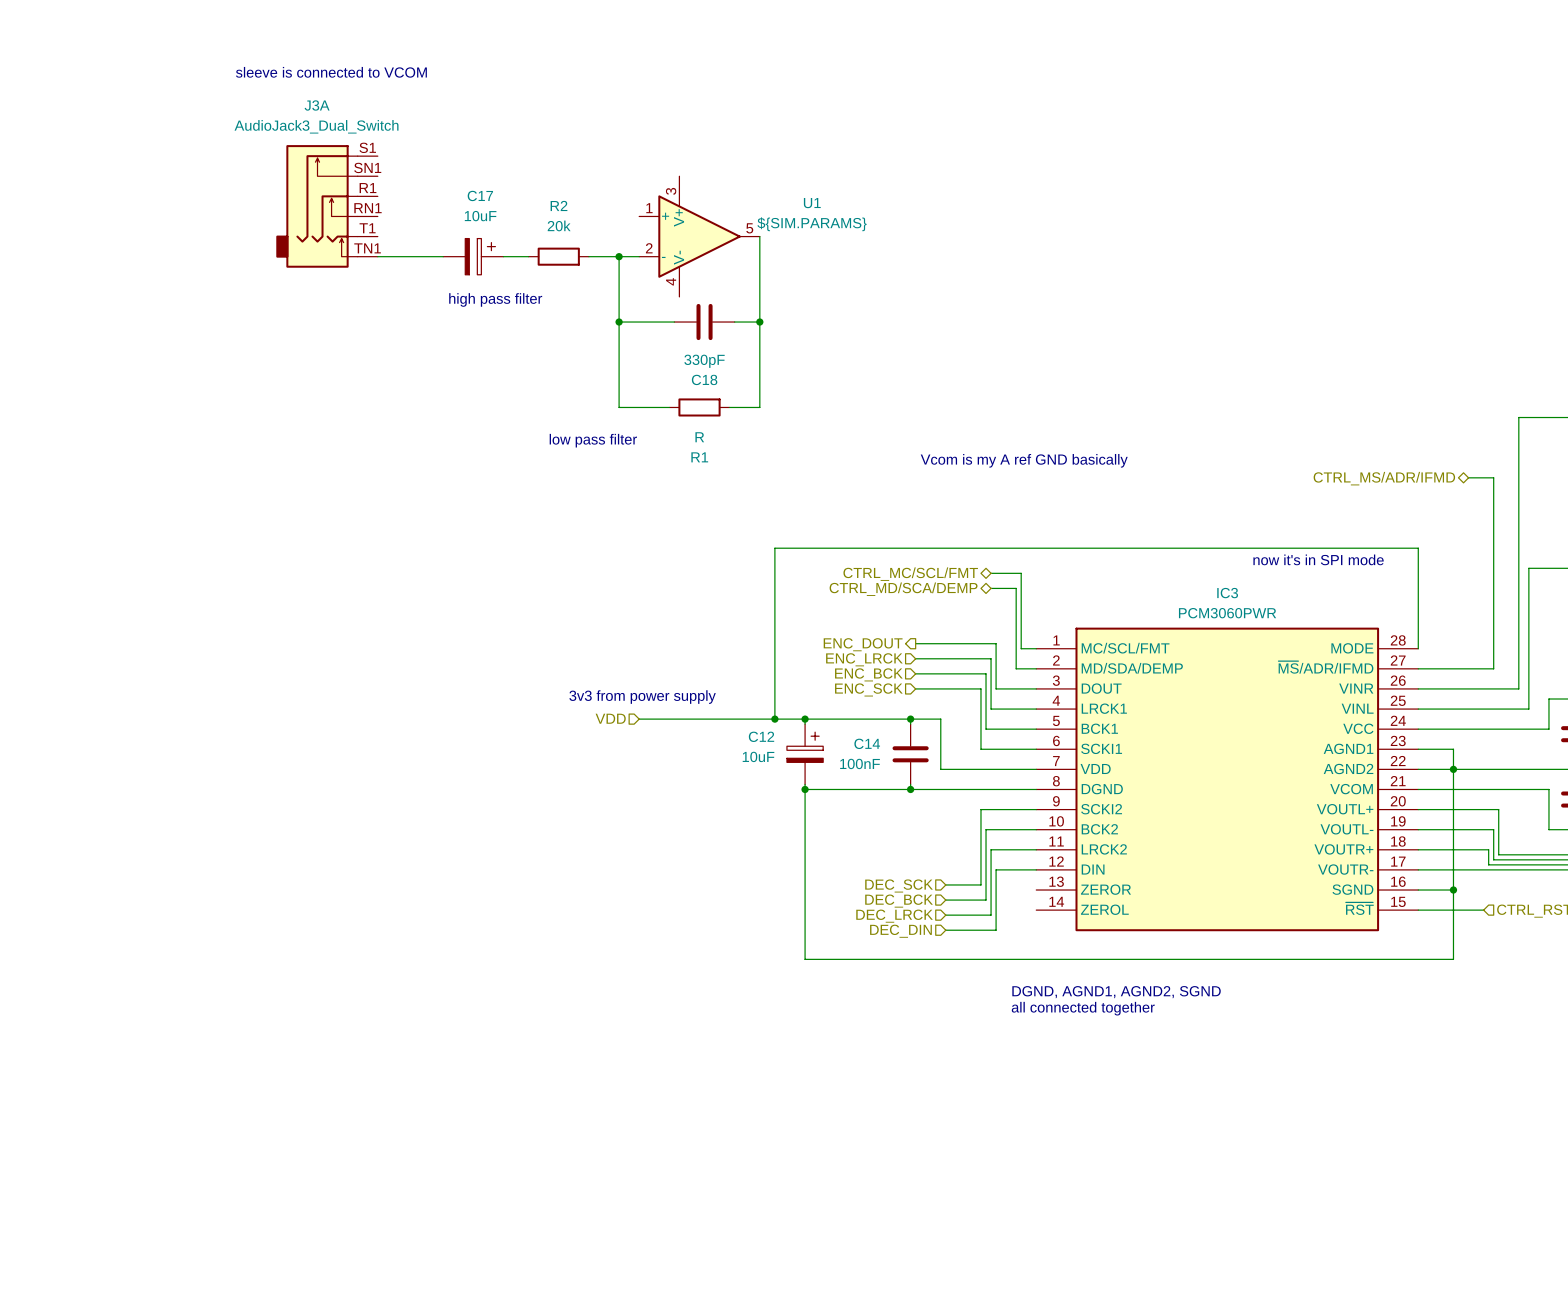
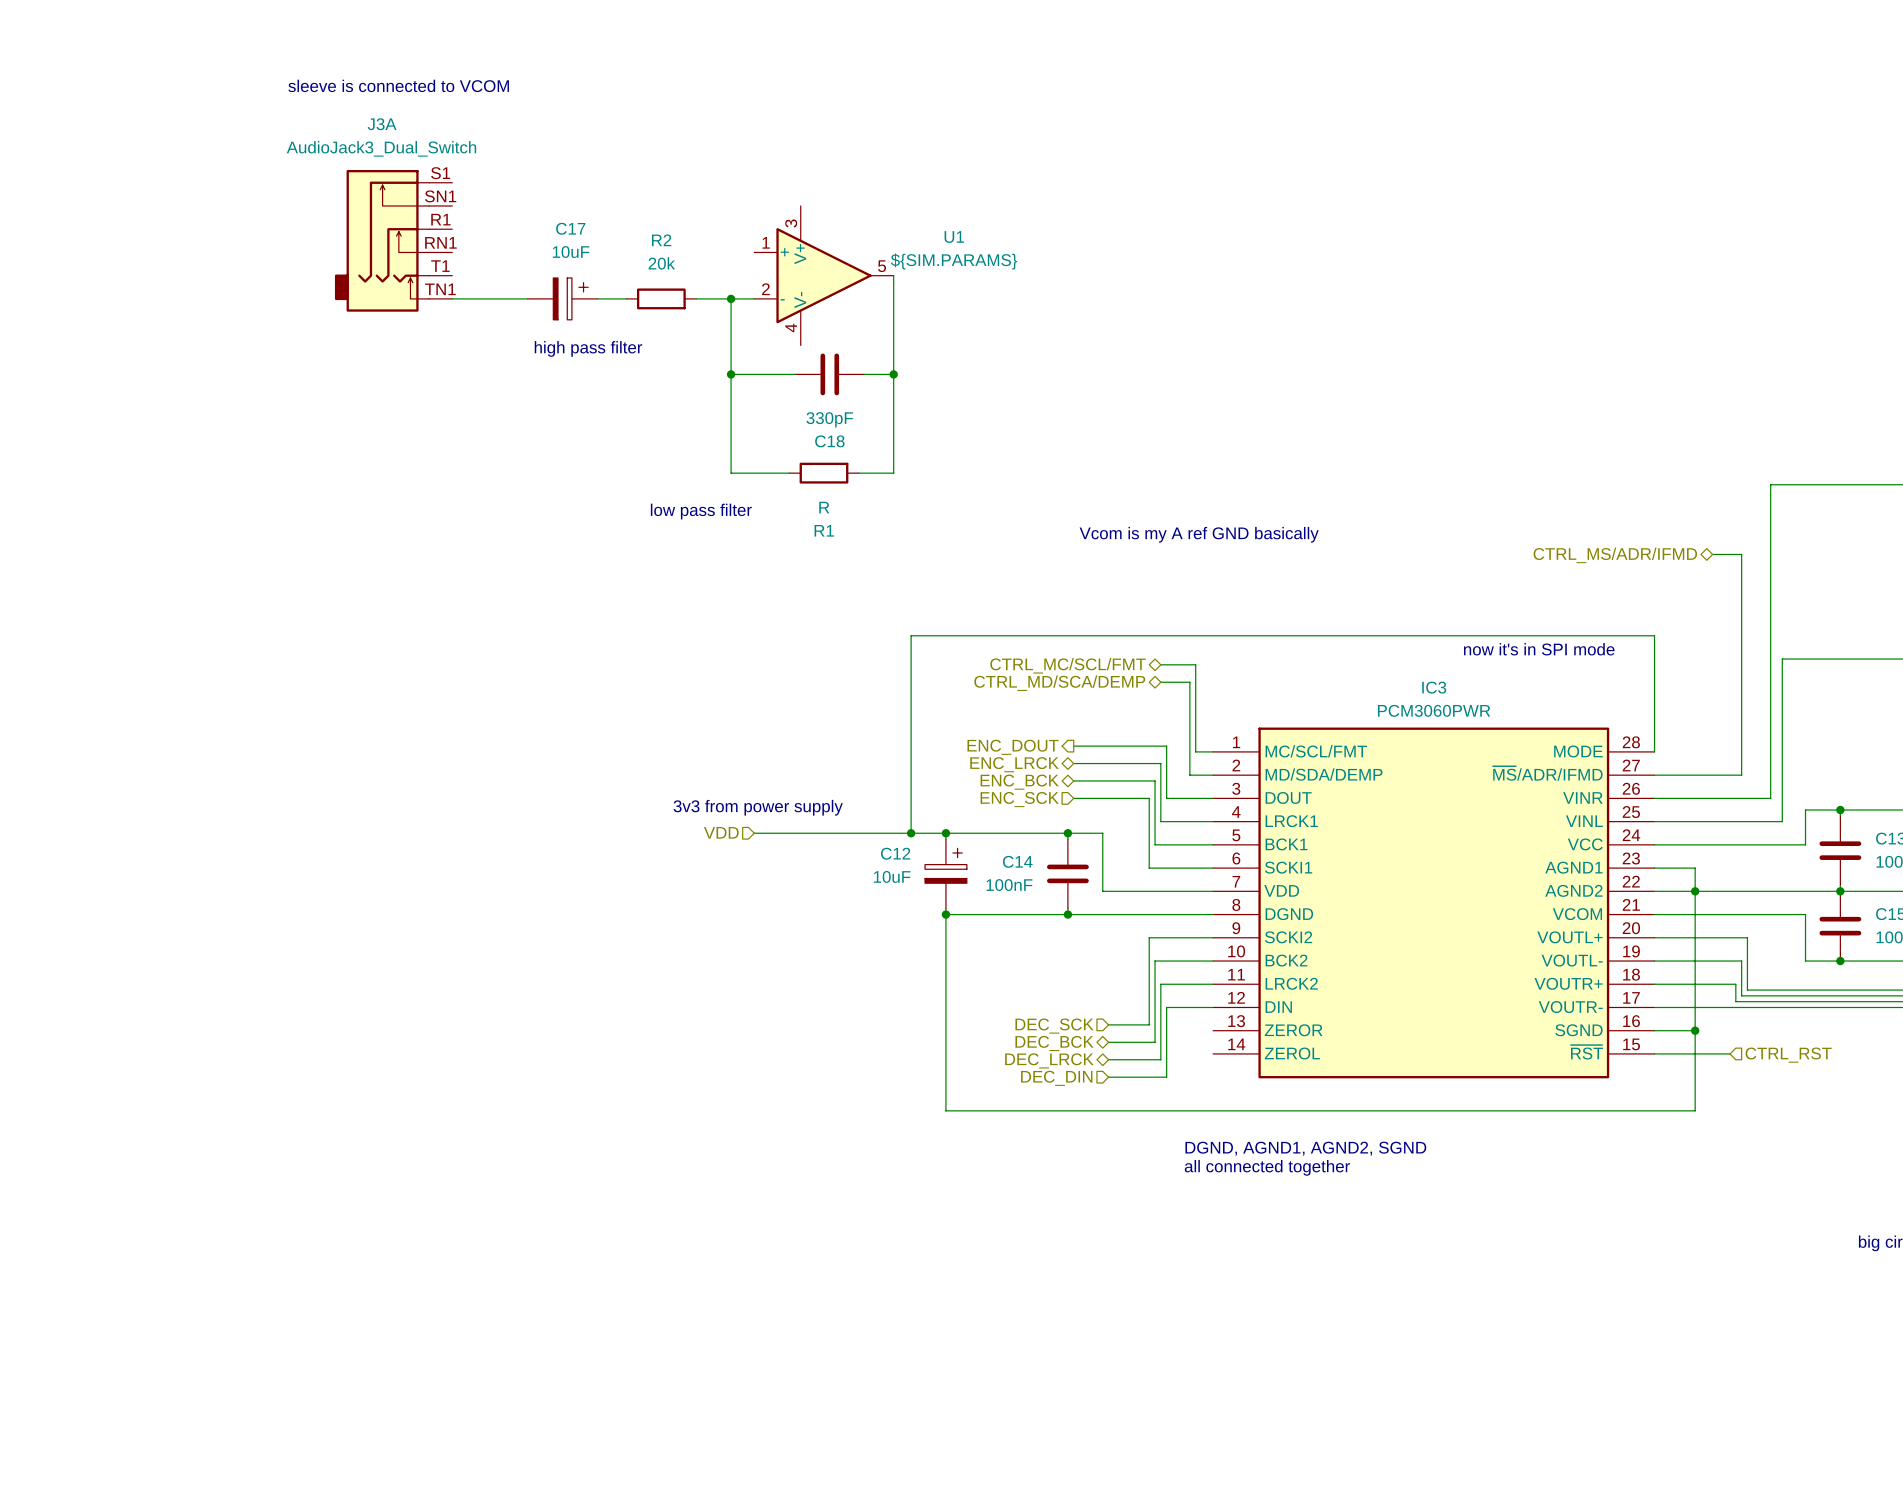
hierarchical label shape: input (864, 659) -> bidirectional (1014, 764)
hierarchical label shape: input (868, 674) -> bidirectional (1019, 782)
hierarchical label shape: input (899, 901) -> bidirectional (1054, 1043)
hierarchical label shape: input (894, 916) -> bidirectional (1049, 1060)

